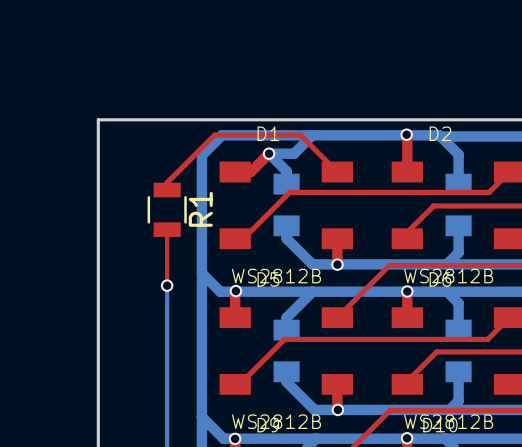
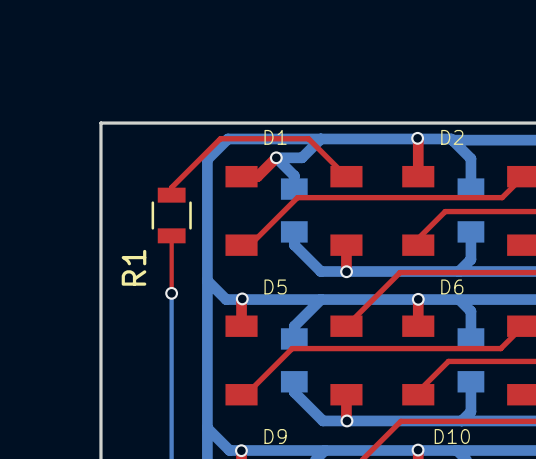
R1 name position: R1 (200, 209) -> R1 (134, 267)
D1 value: WS2812B (276, 276) -> none
D2 value: WS2812B (448, 276) -> none
D5 value: WS2812B (276, 421) -> none
D6 value: WS2812B (448, 421) -> none

